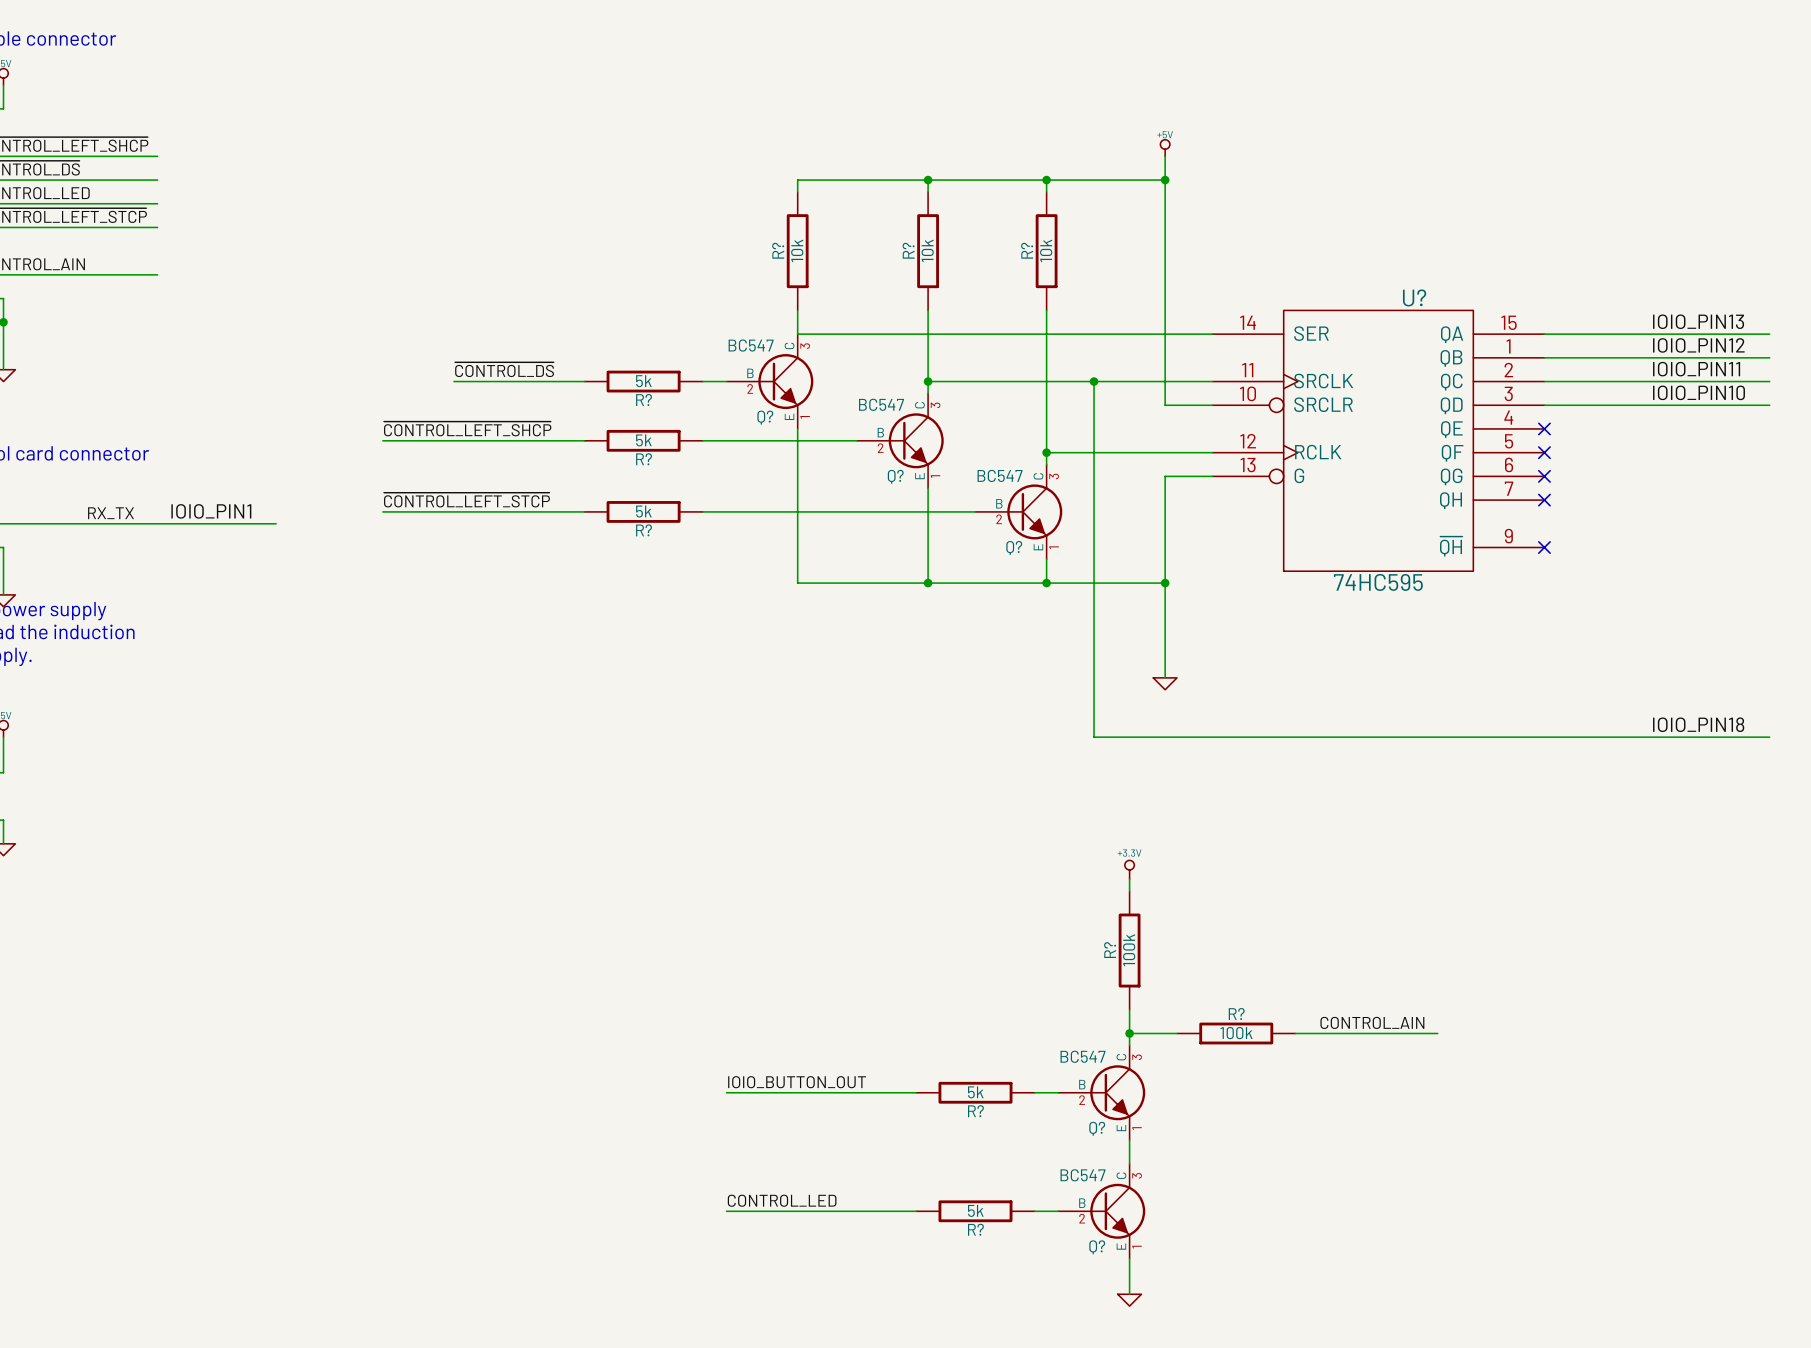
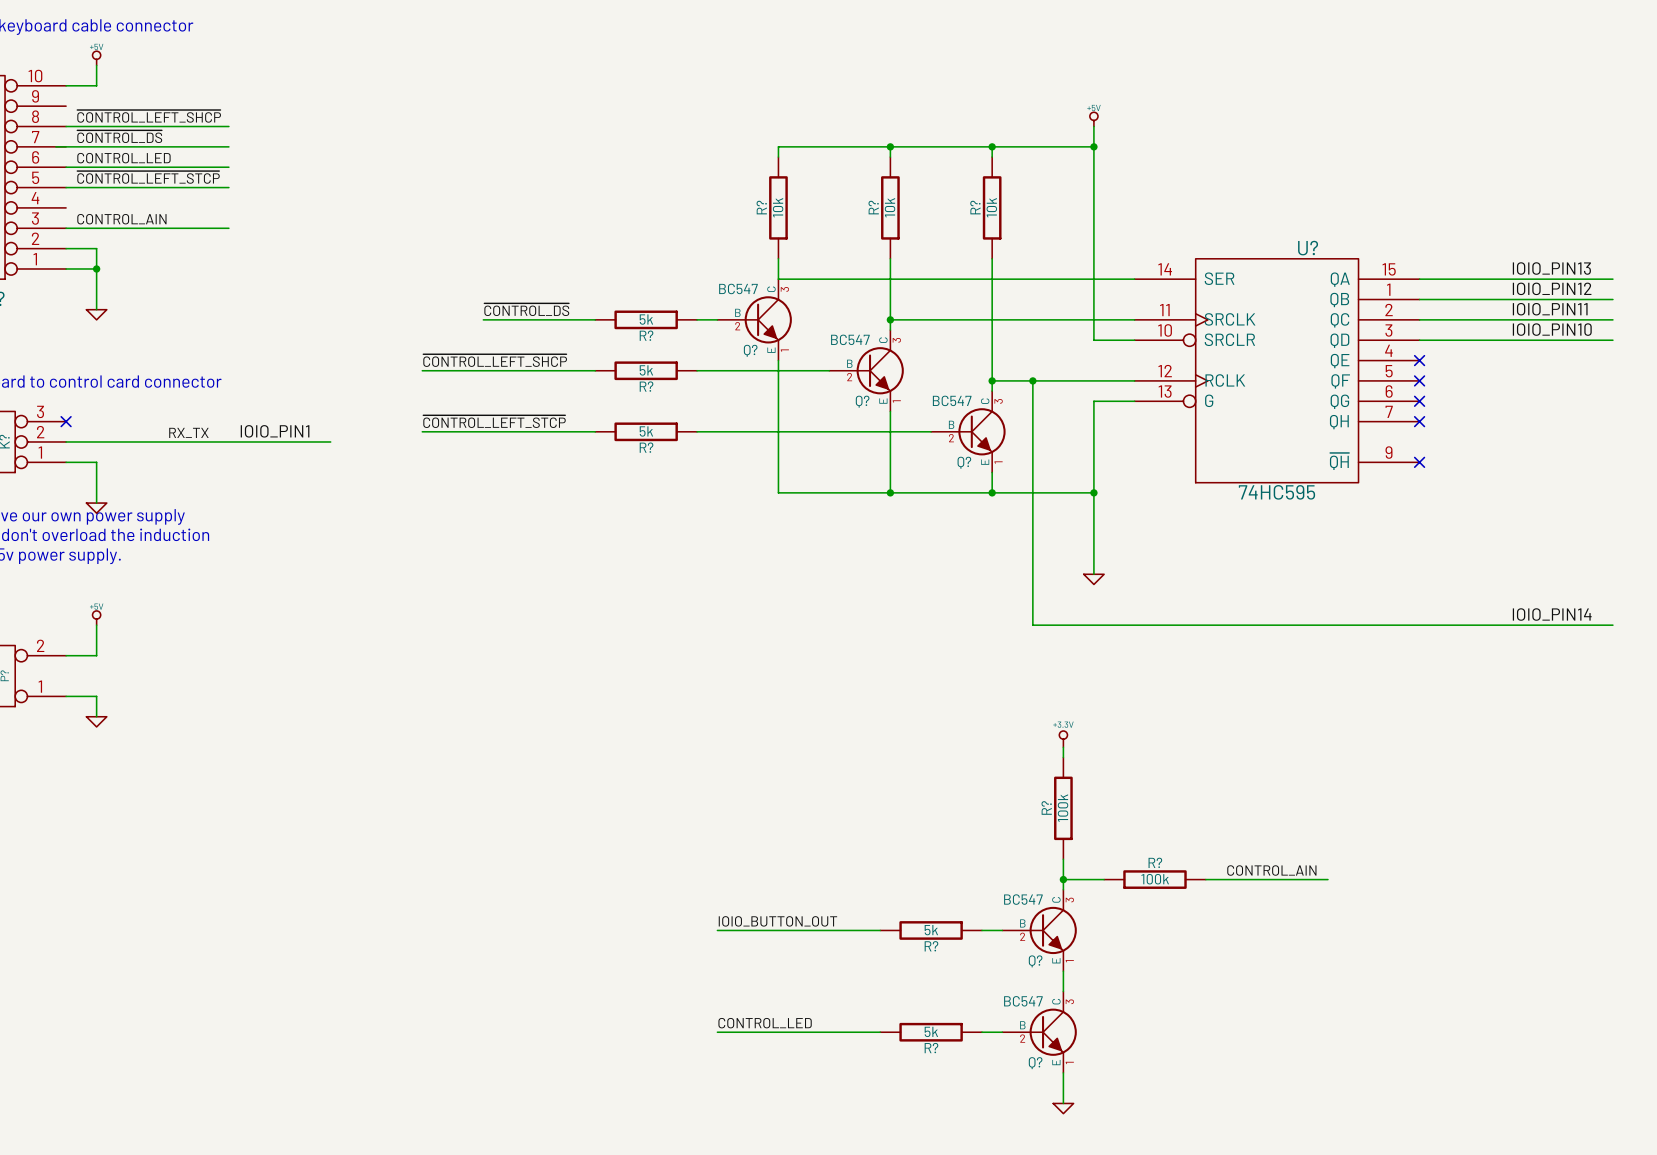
wire: (1094, 381) (1094, 452) -> none
junction: (1094, 381) -> none
junction: none -> (1032, 380)
label: IOIO_PIN18 (1698, 724) -> IOIO_PIN14 (1552, 614)

